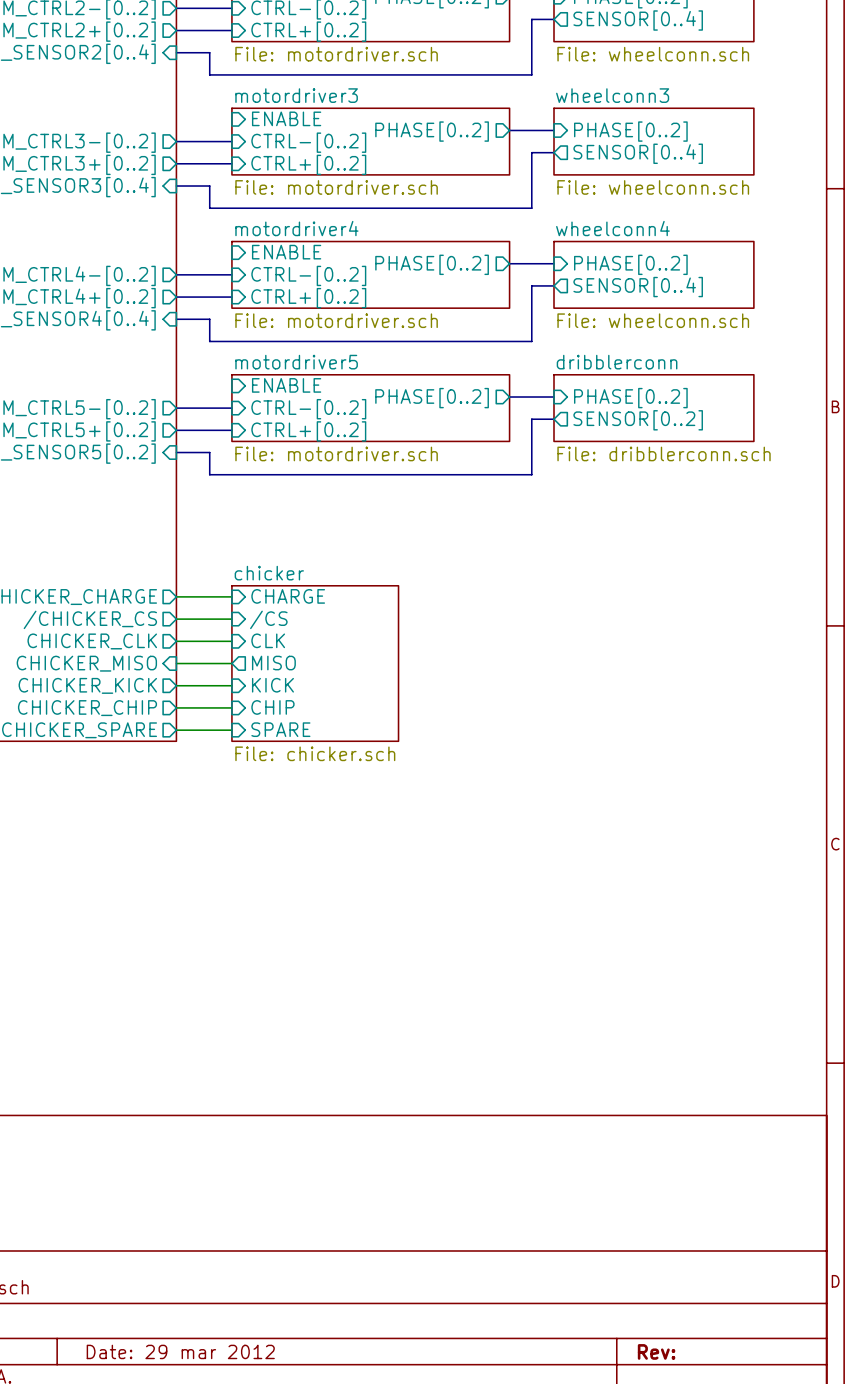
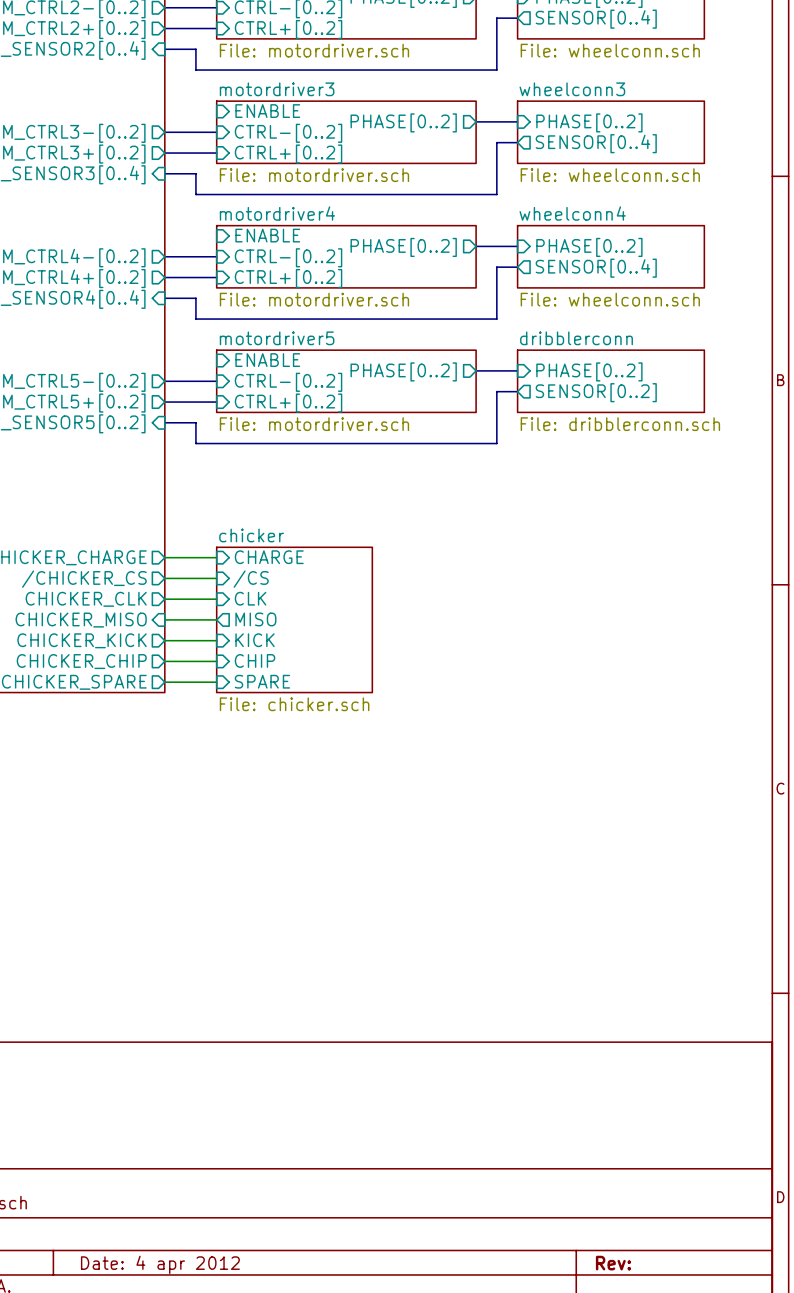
title block: Date: 29 mar 2012 (180, 1351) -> Date: 4 apr 2012 (160, 1264)

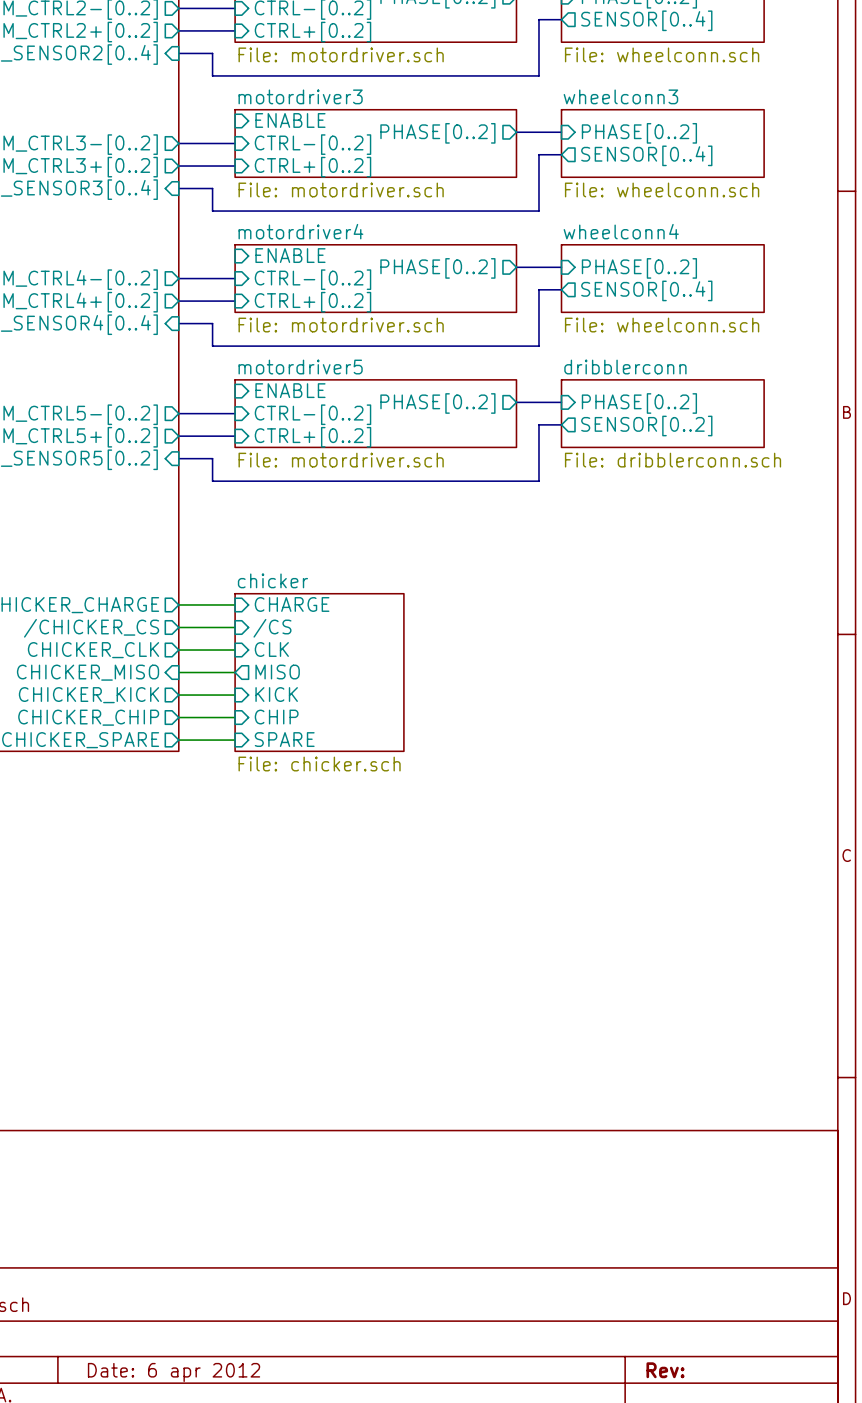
title block: Date: 4 apr 2012 (160, 1264) -> Date: 6 apr 2012 (174, 1372)

